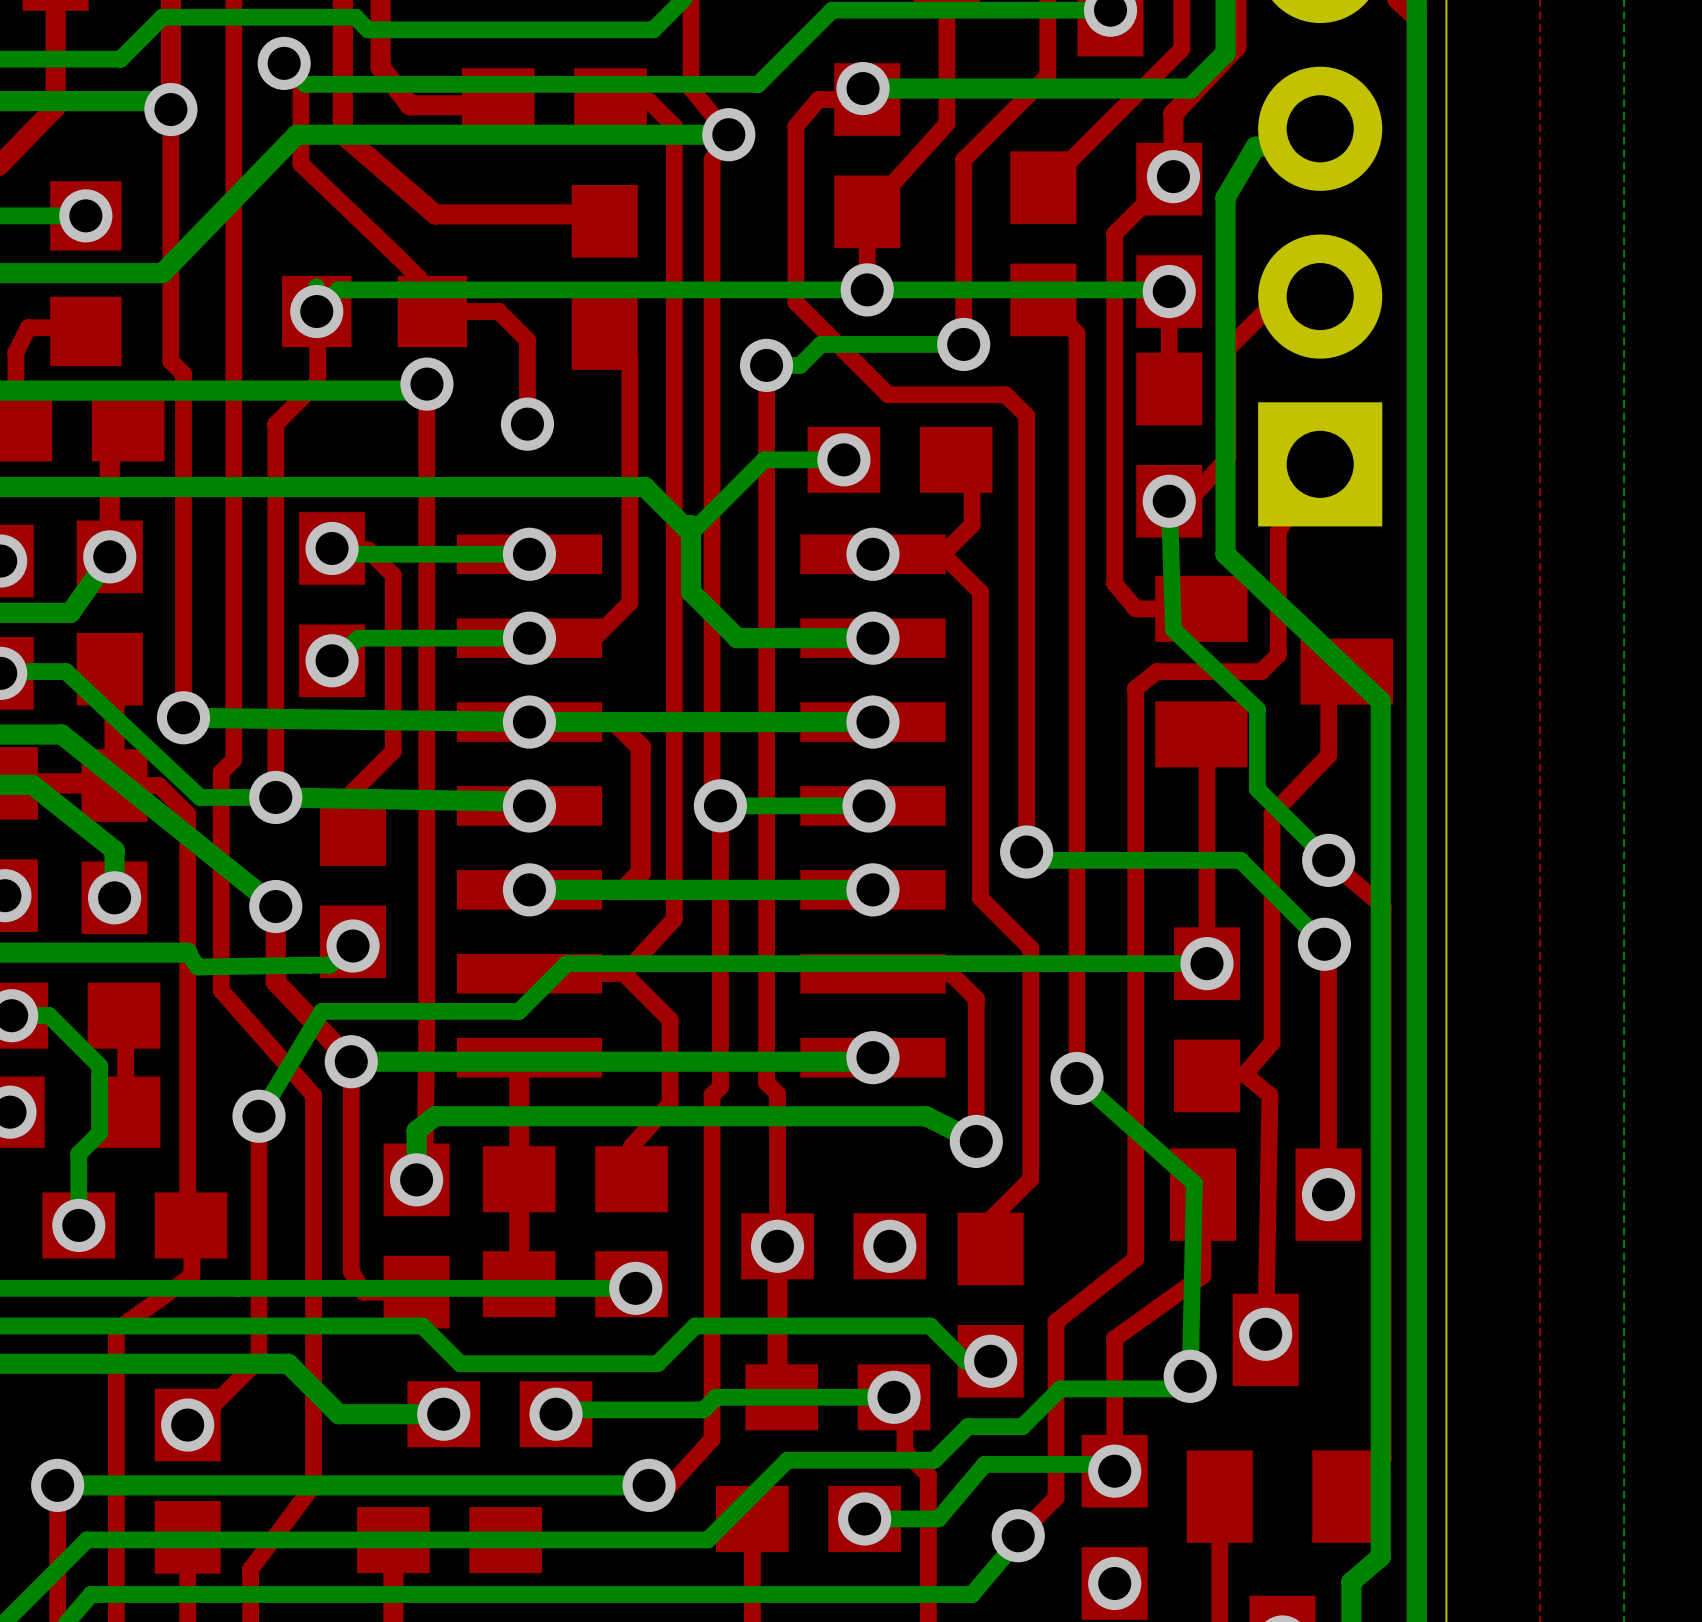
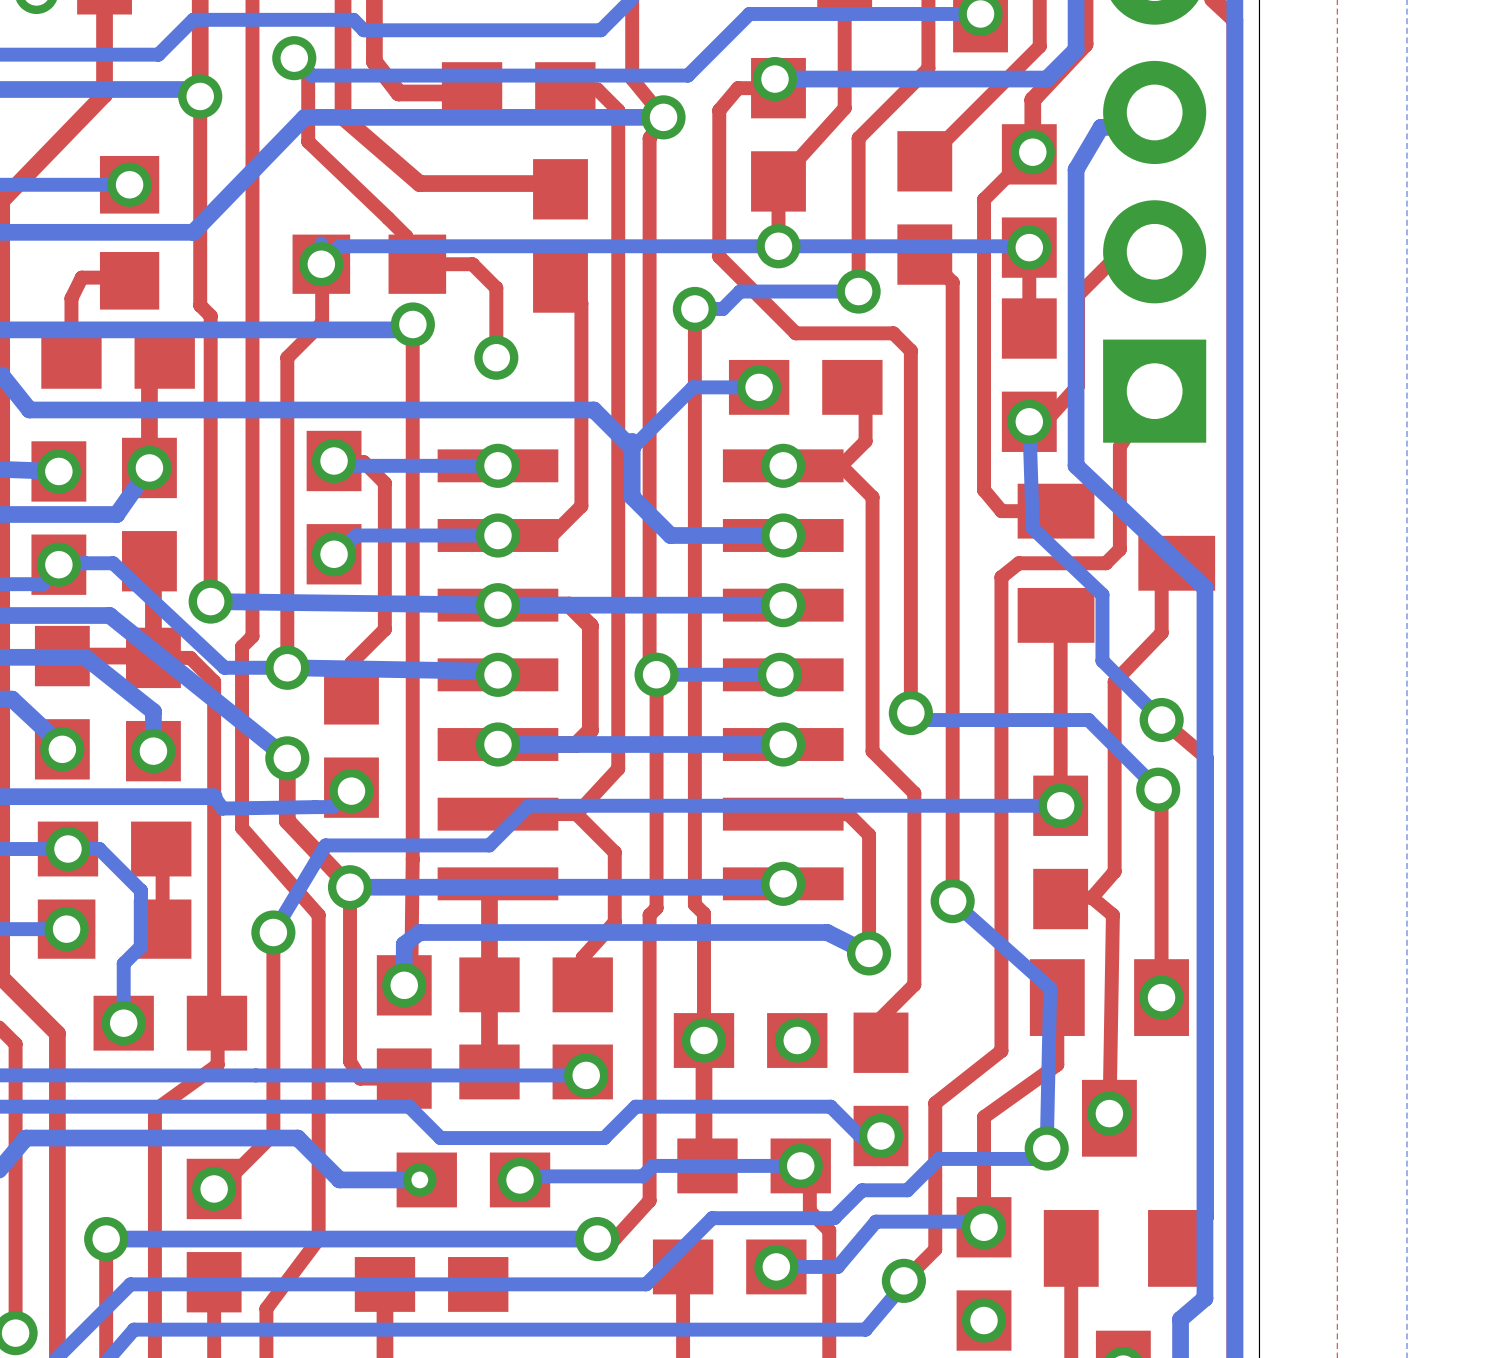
via size: [417, 1387, 471, 1441] -> [403, 1163, 437, 1197]

